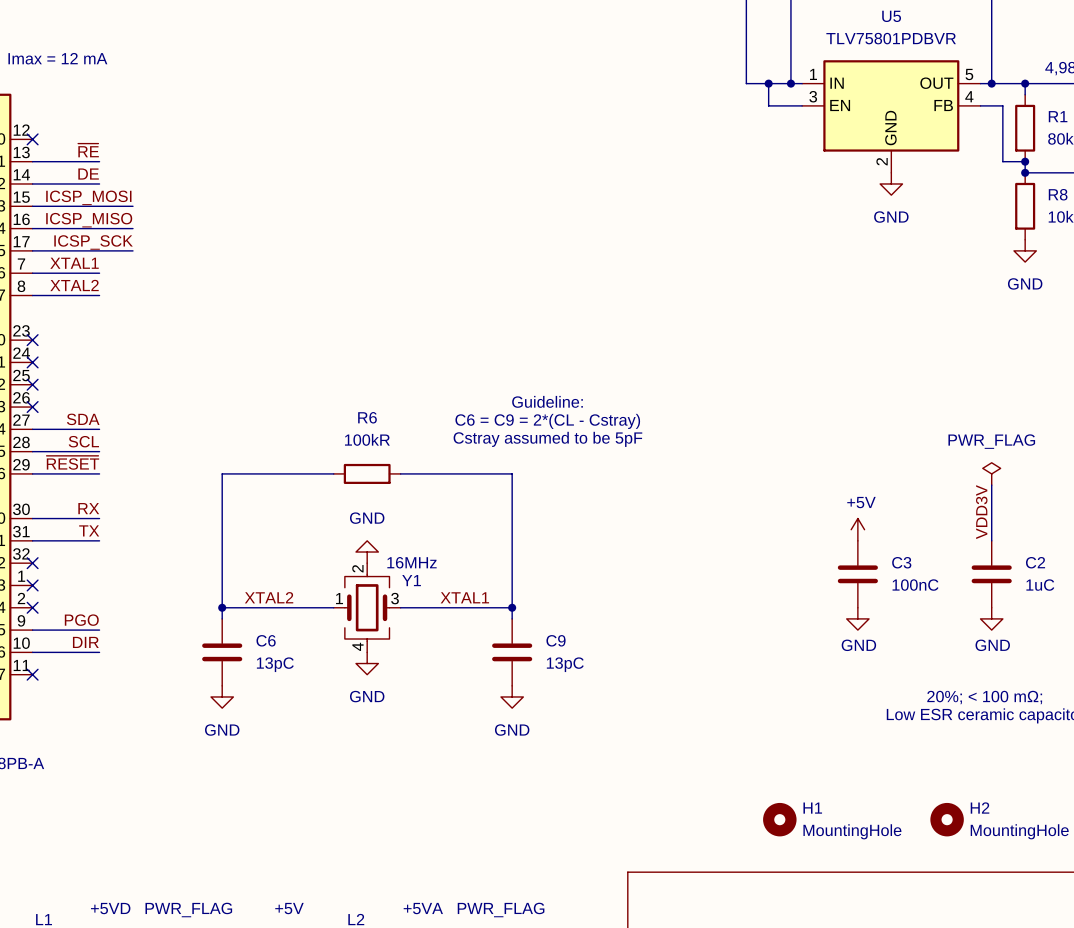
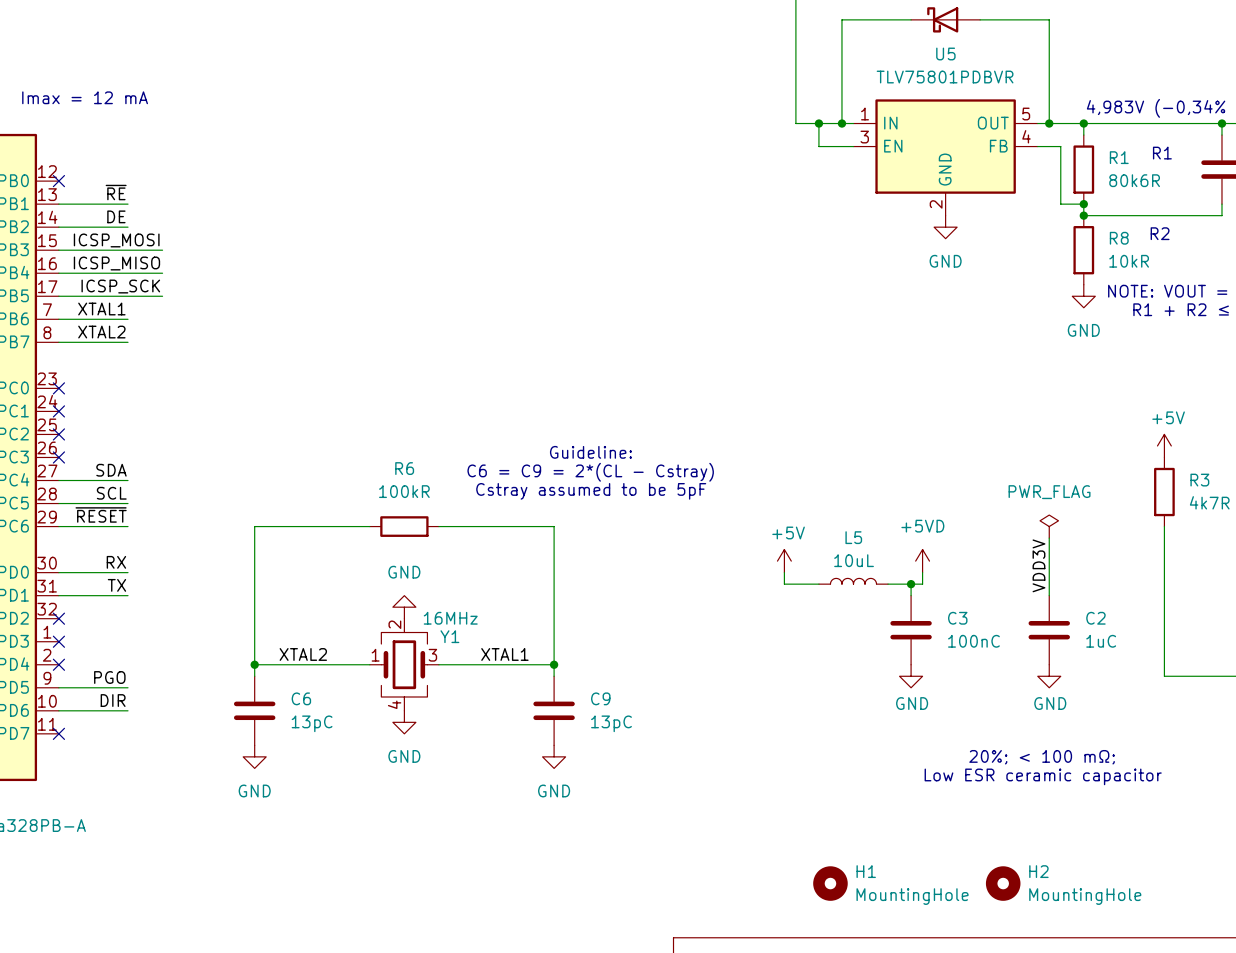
power symbol: none -> +5VD (922, 561)
wire: none -> (784, 572) (784, 584) (818, 584)
wire: none -> (922, 572) (922, 584) (888, 584)
L5: none -> 10uL (853, 581)
power symbol position: +5V (857, 529) -> +5V (784, 561)
junction: none -> (911, 584)

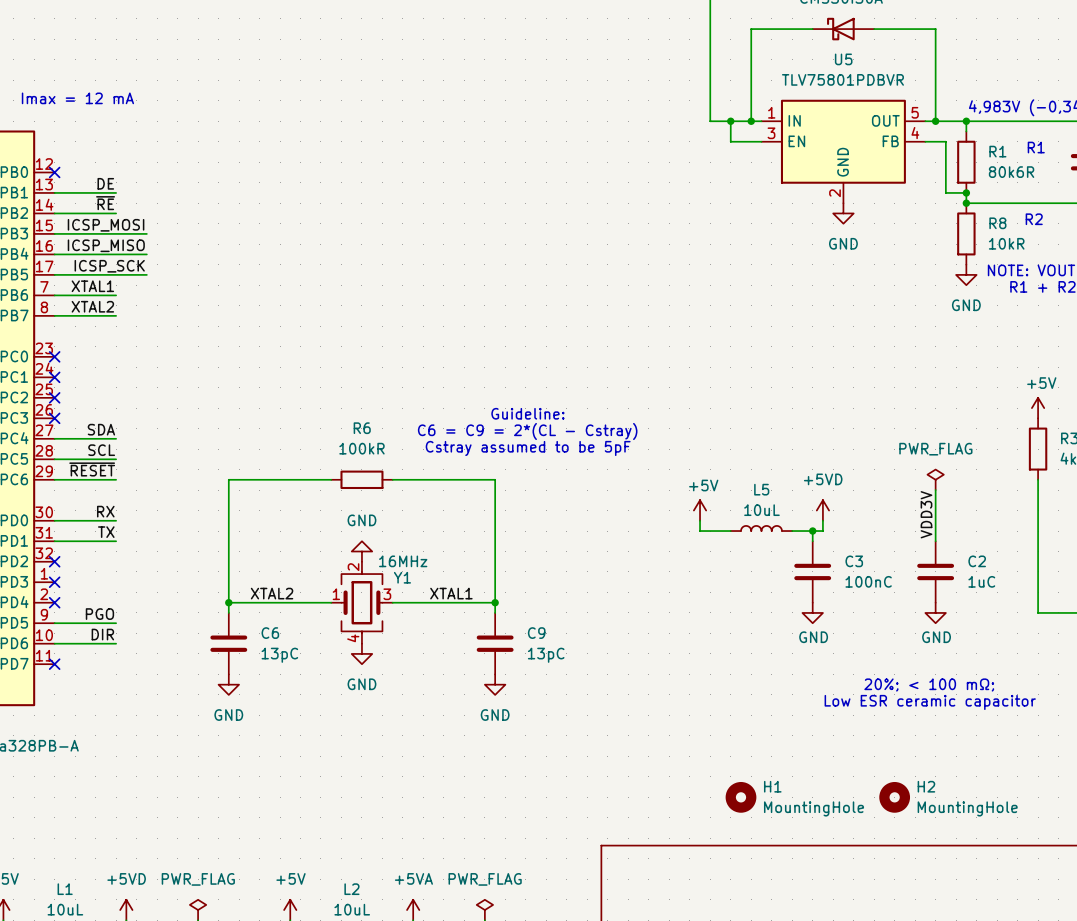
label: ~{RE} (116, 192) -> DE (105, 183)
label: DE (116, 216) -> ~{RE} (105, 203)

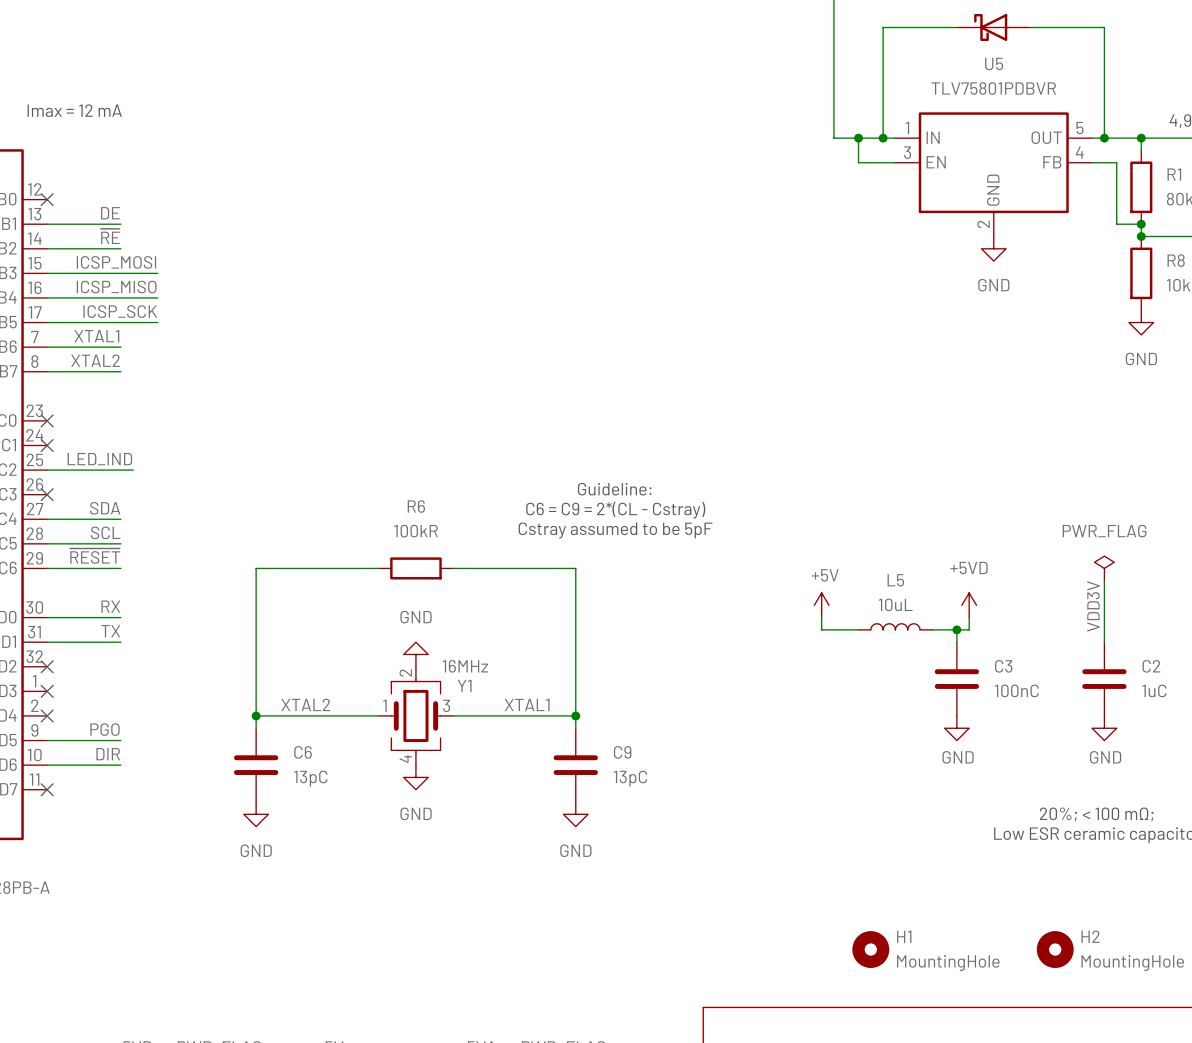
label: none -> LED_IND (99, 459)
wire: none -> (47, 470) (133, 470)
no-connect mark: (54, 397) -> none

